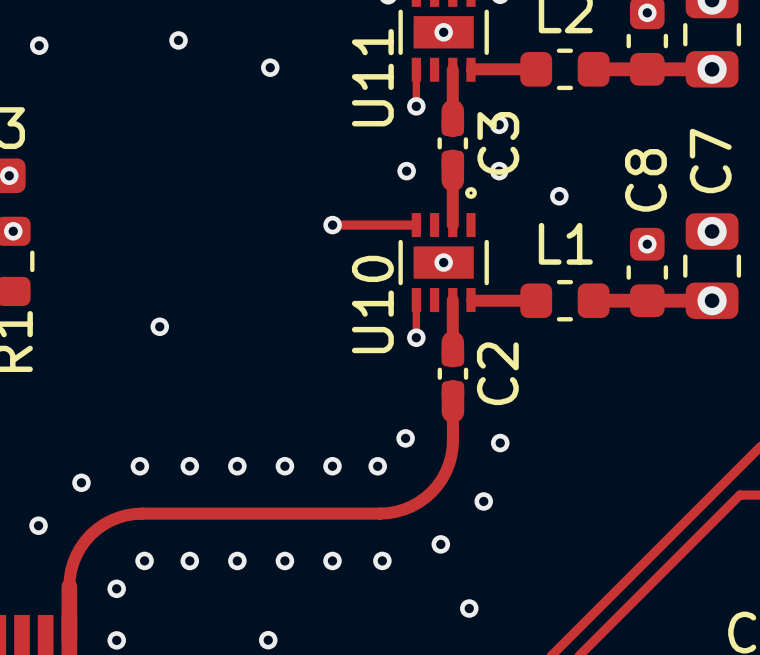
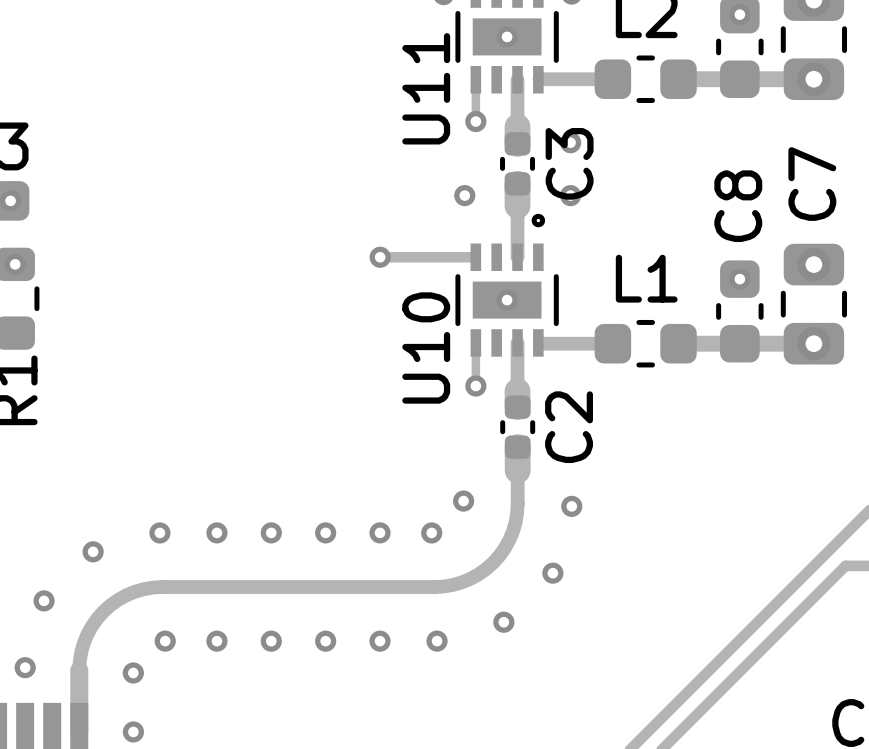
via: (178, 40) -> none
via: (39, 45) -> none
via: (270, 67) -> none
via: (559, 196) -> none
via: (159, 326) -> none
via: none -> (25, 667)
via: (469, 608) -> none
via: (268, 640) -> none

